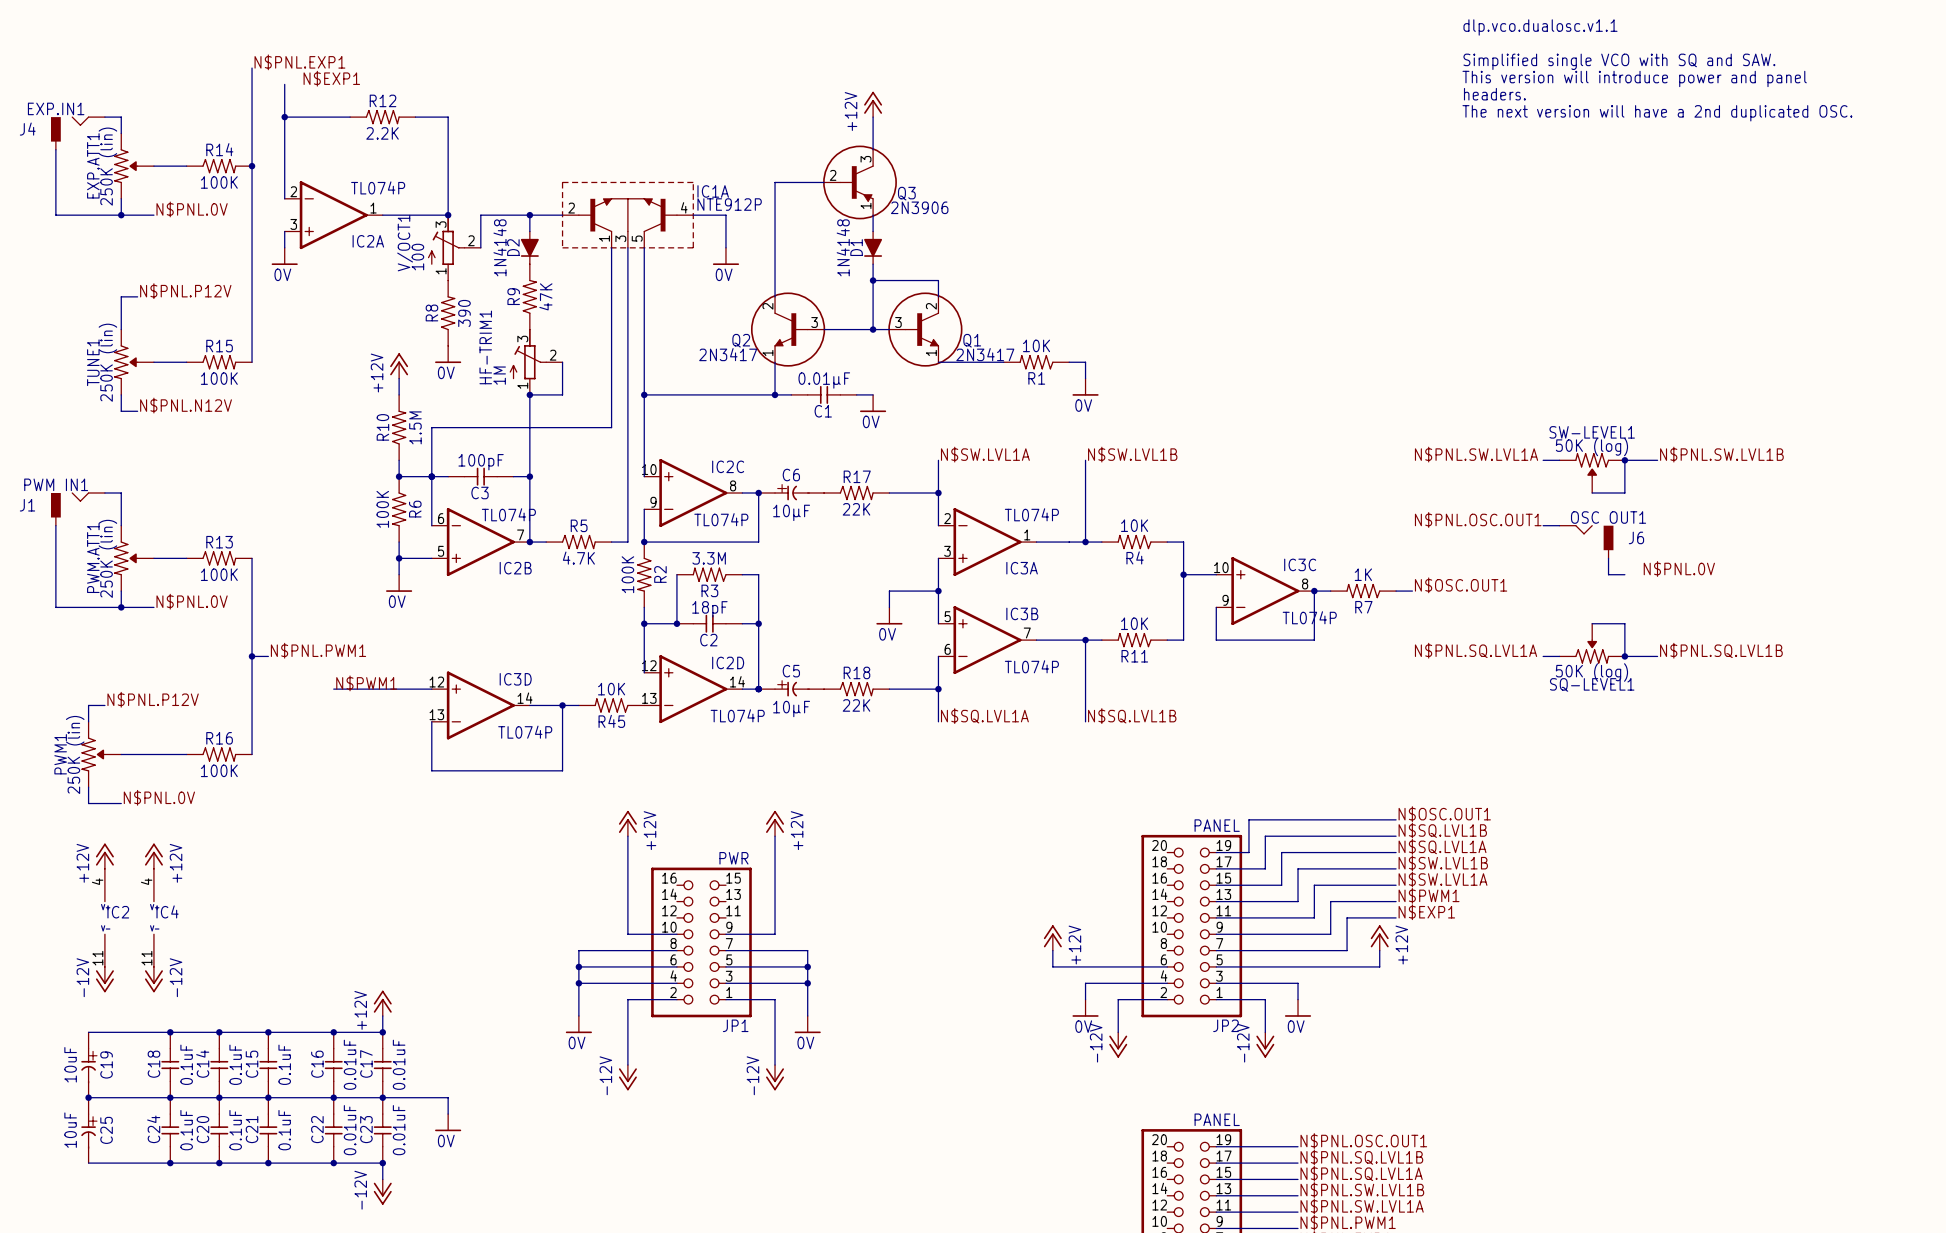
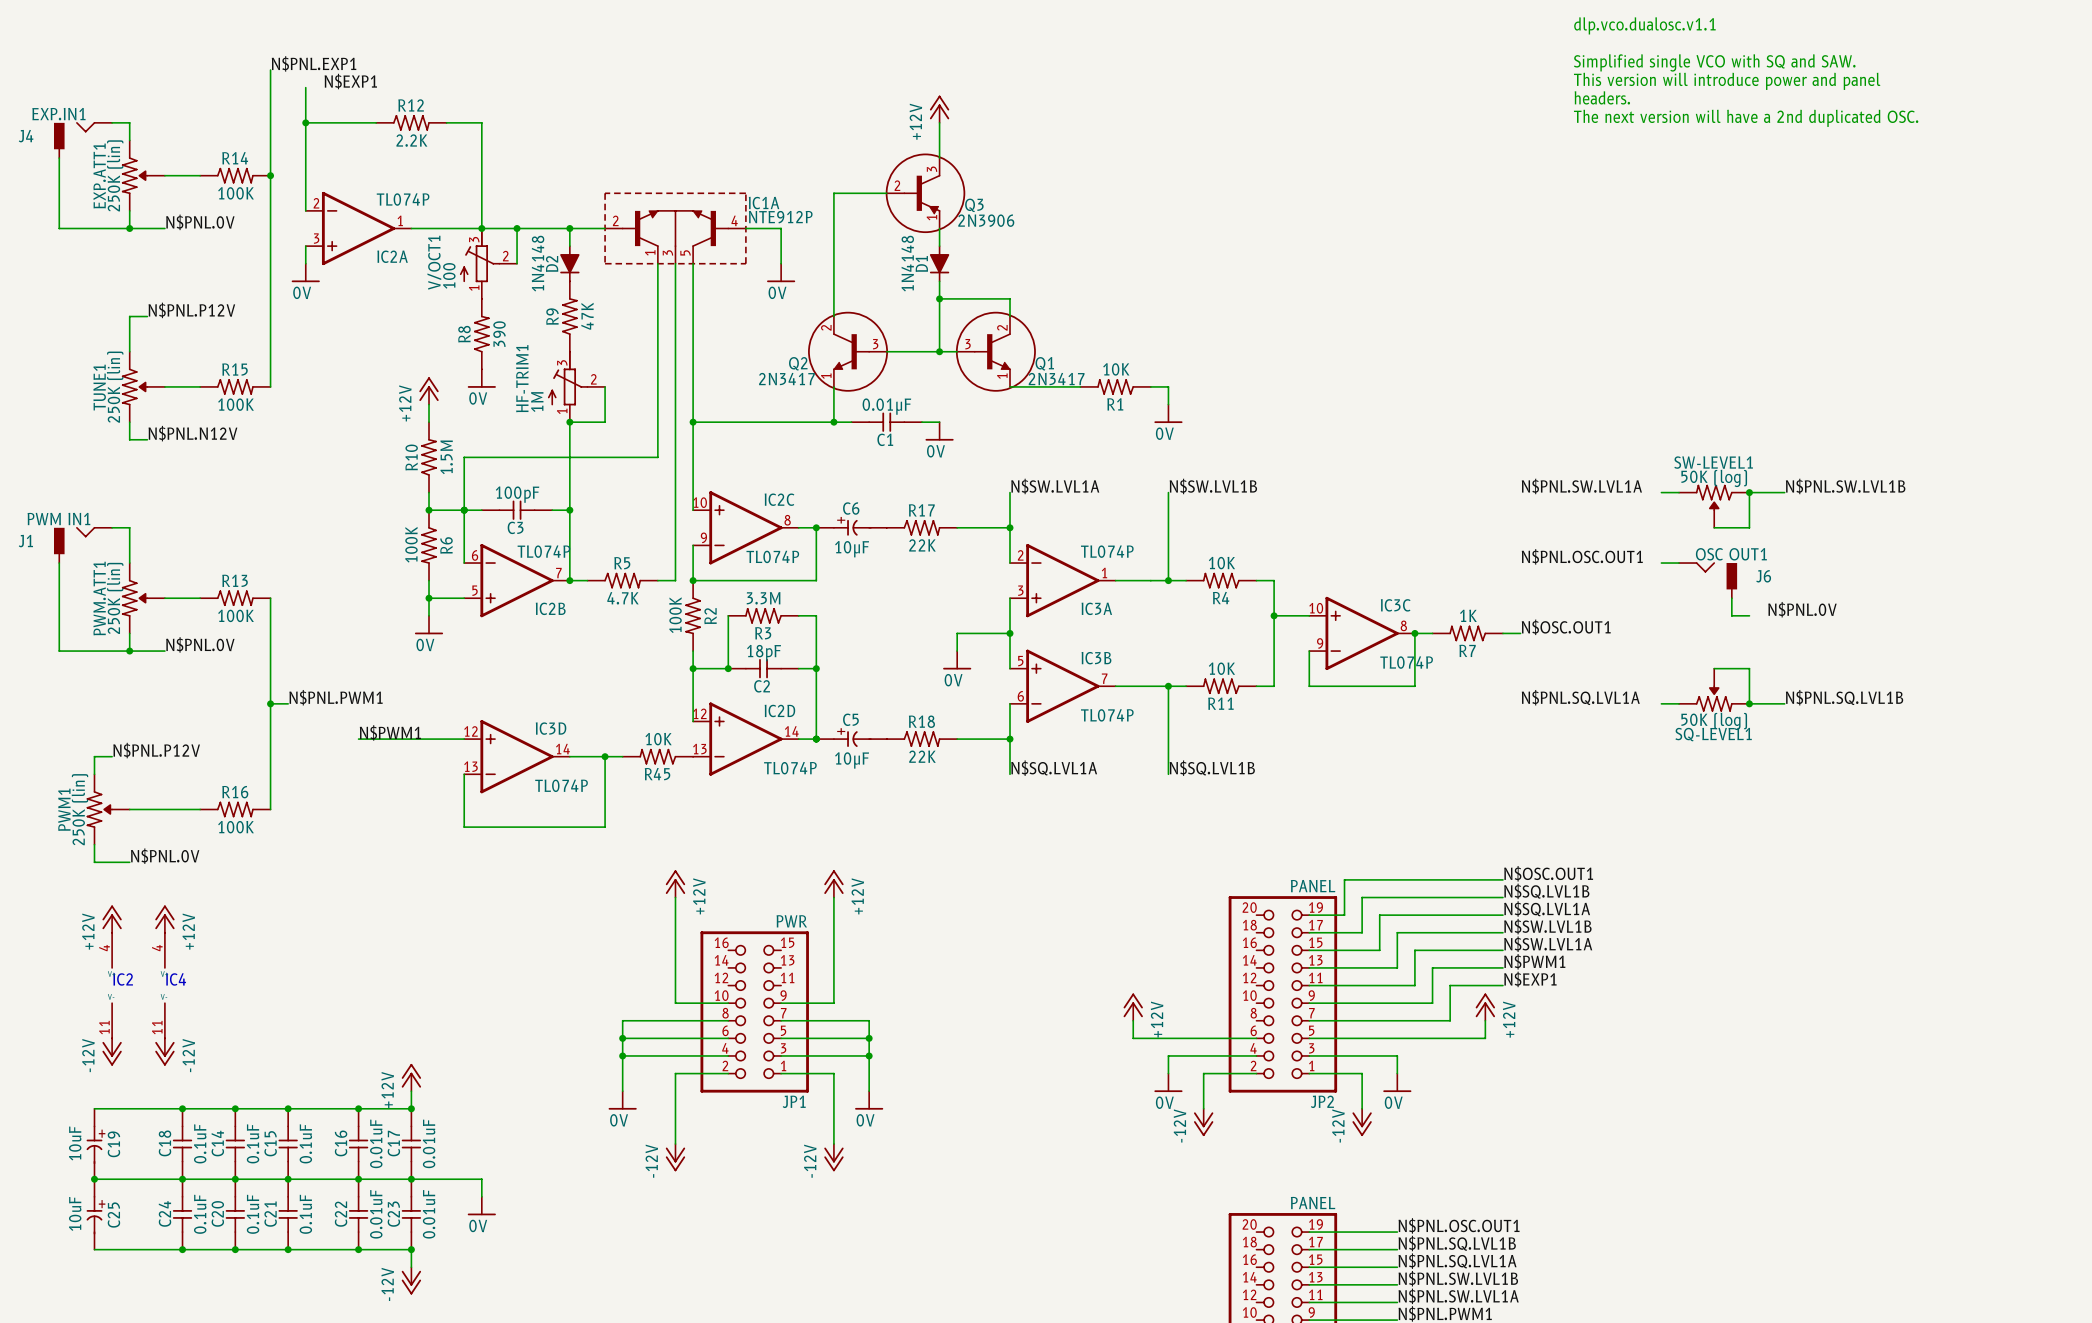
wire: none -> (481, 228) (517, 228)
junction: none -> (517, 228)

